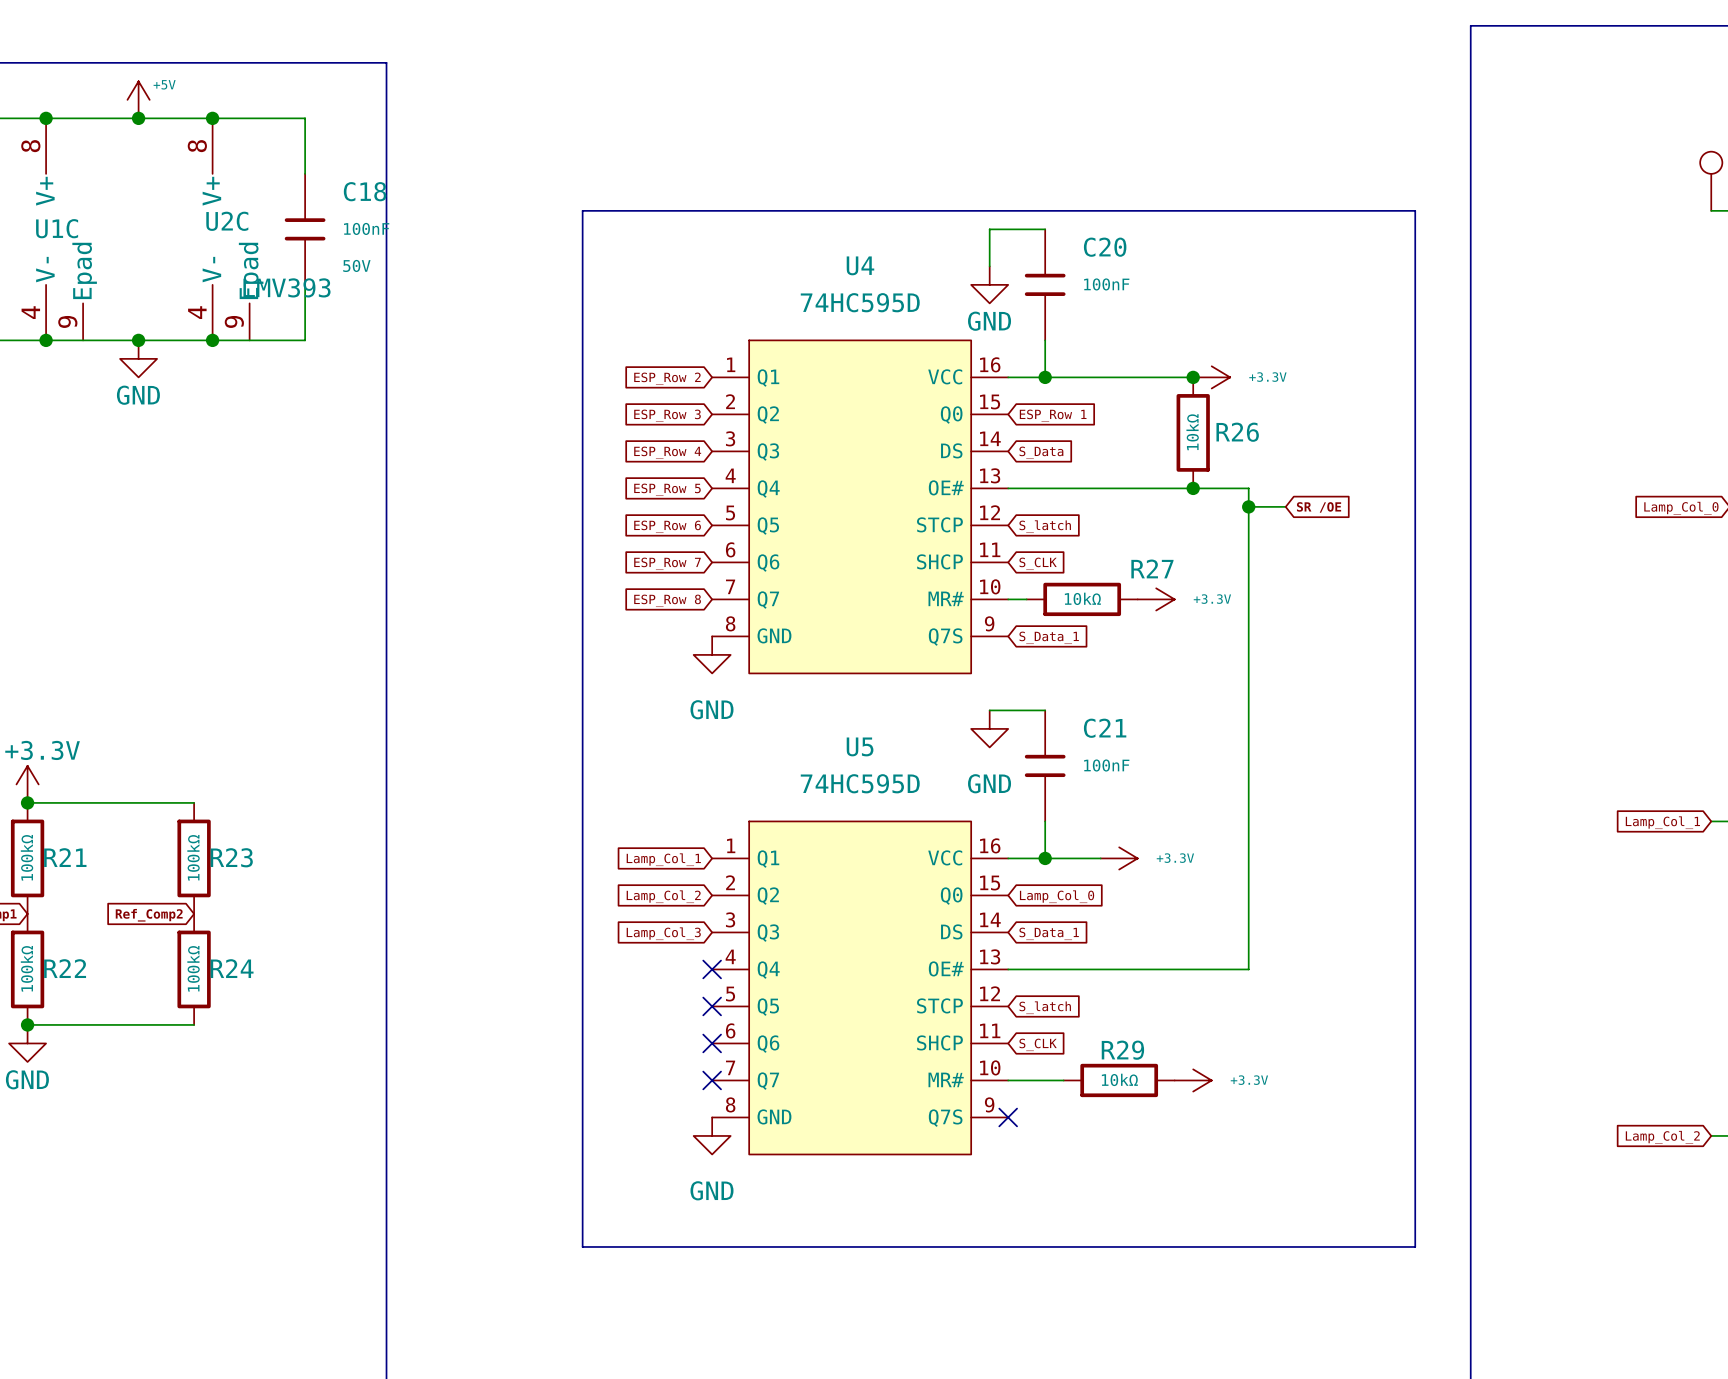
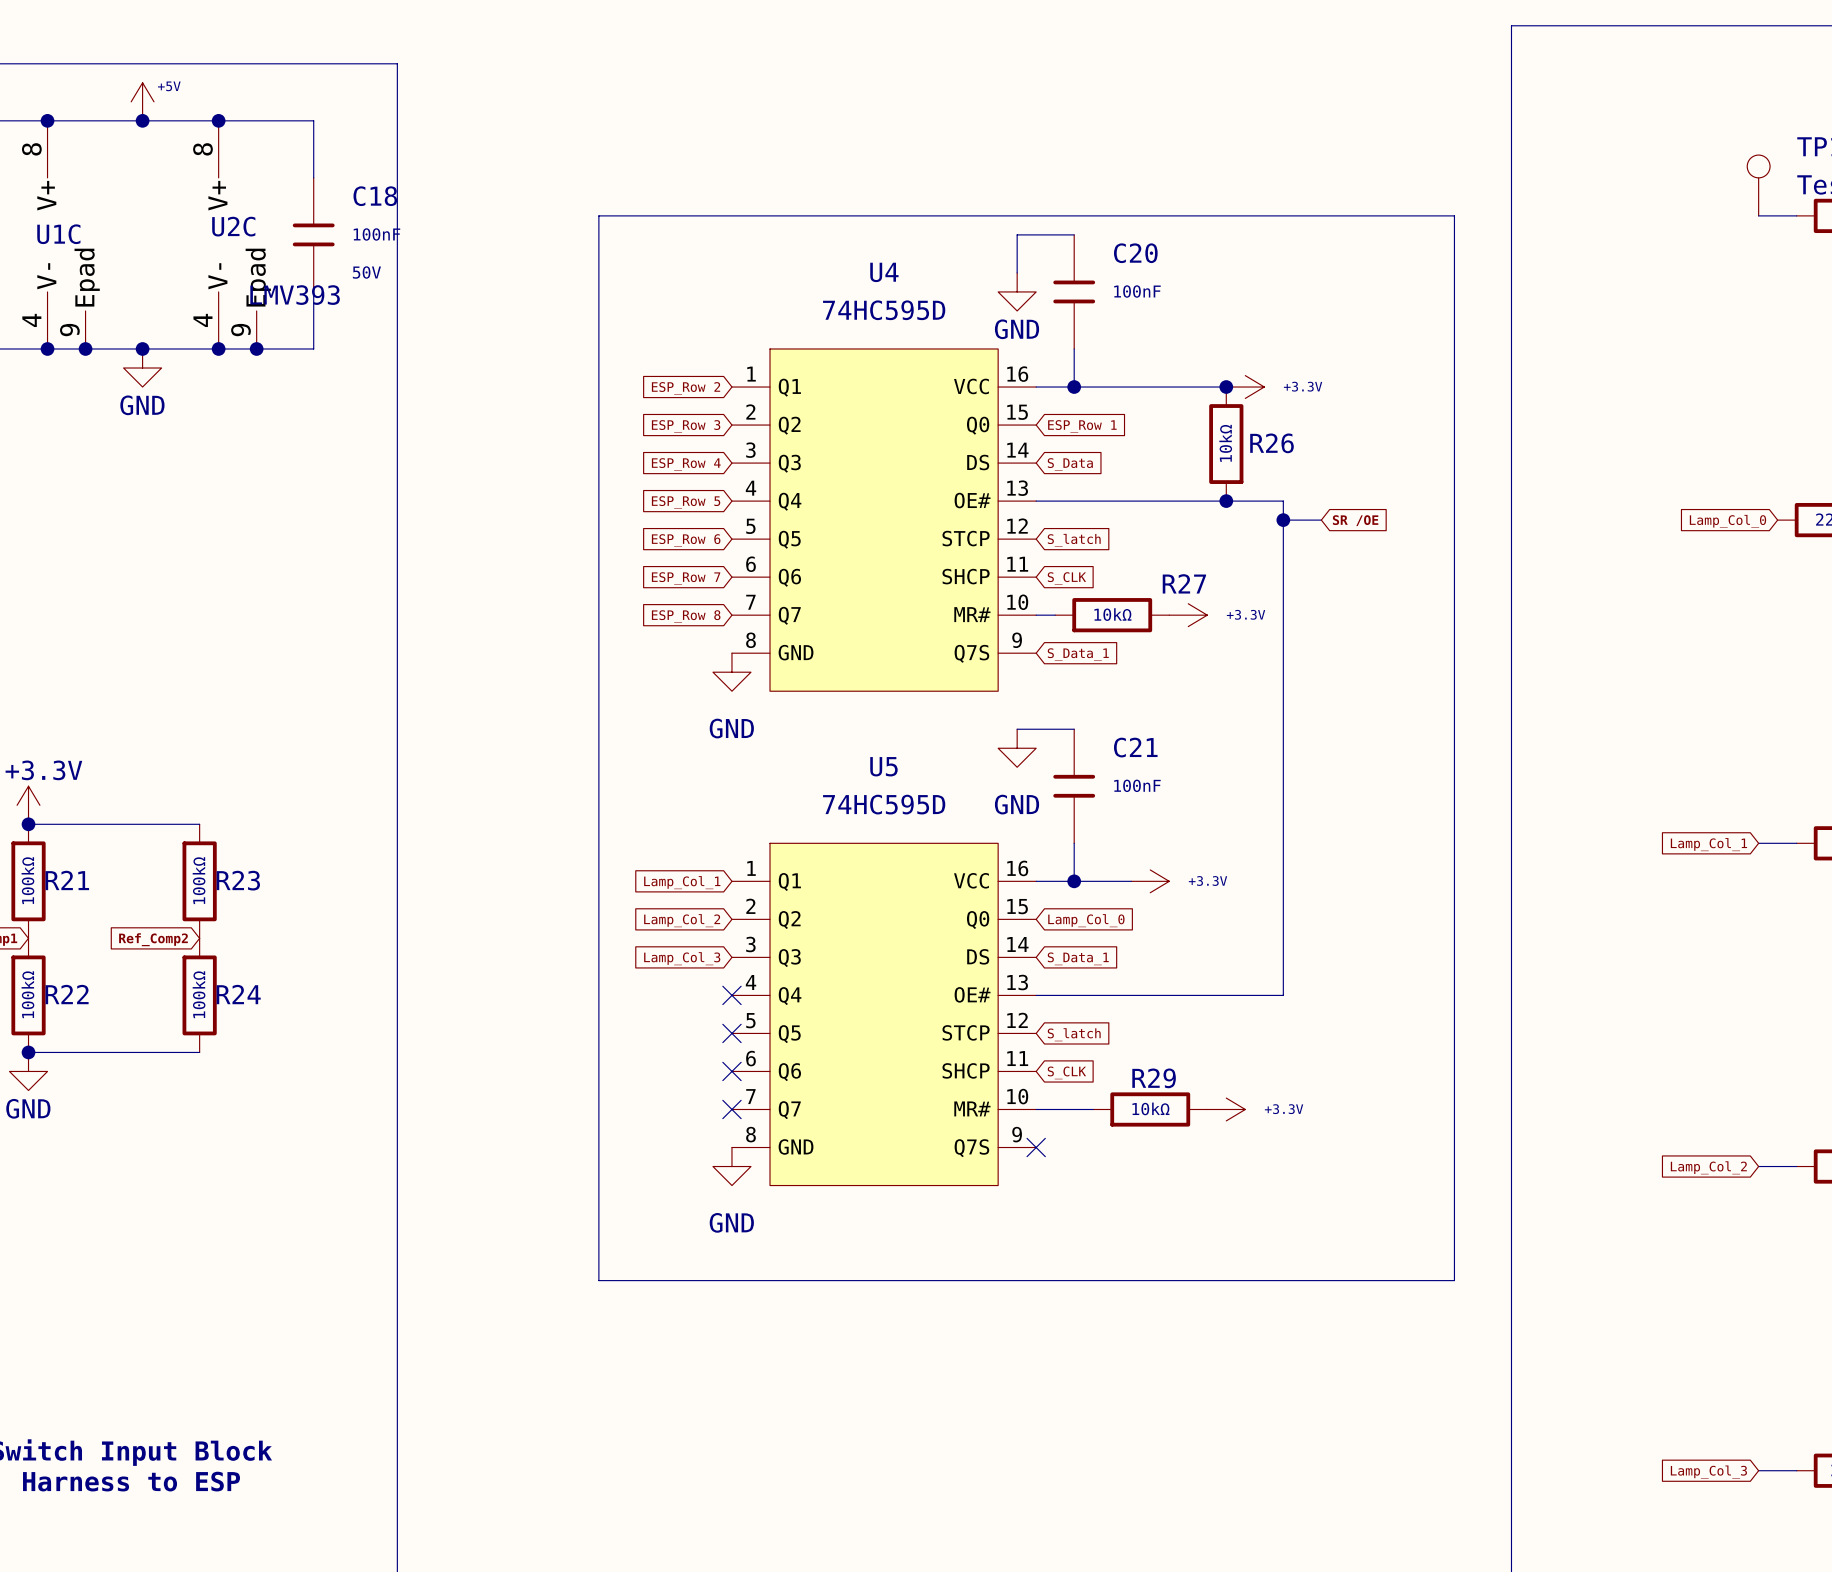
junction: none -> (85, 348)
junction: none -> (256, 348)

